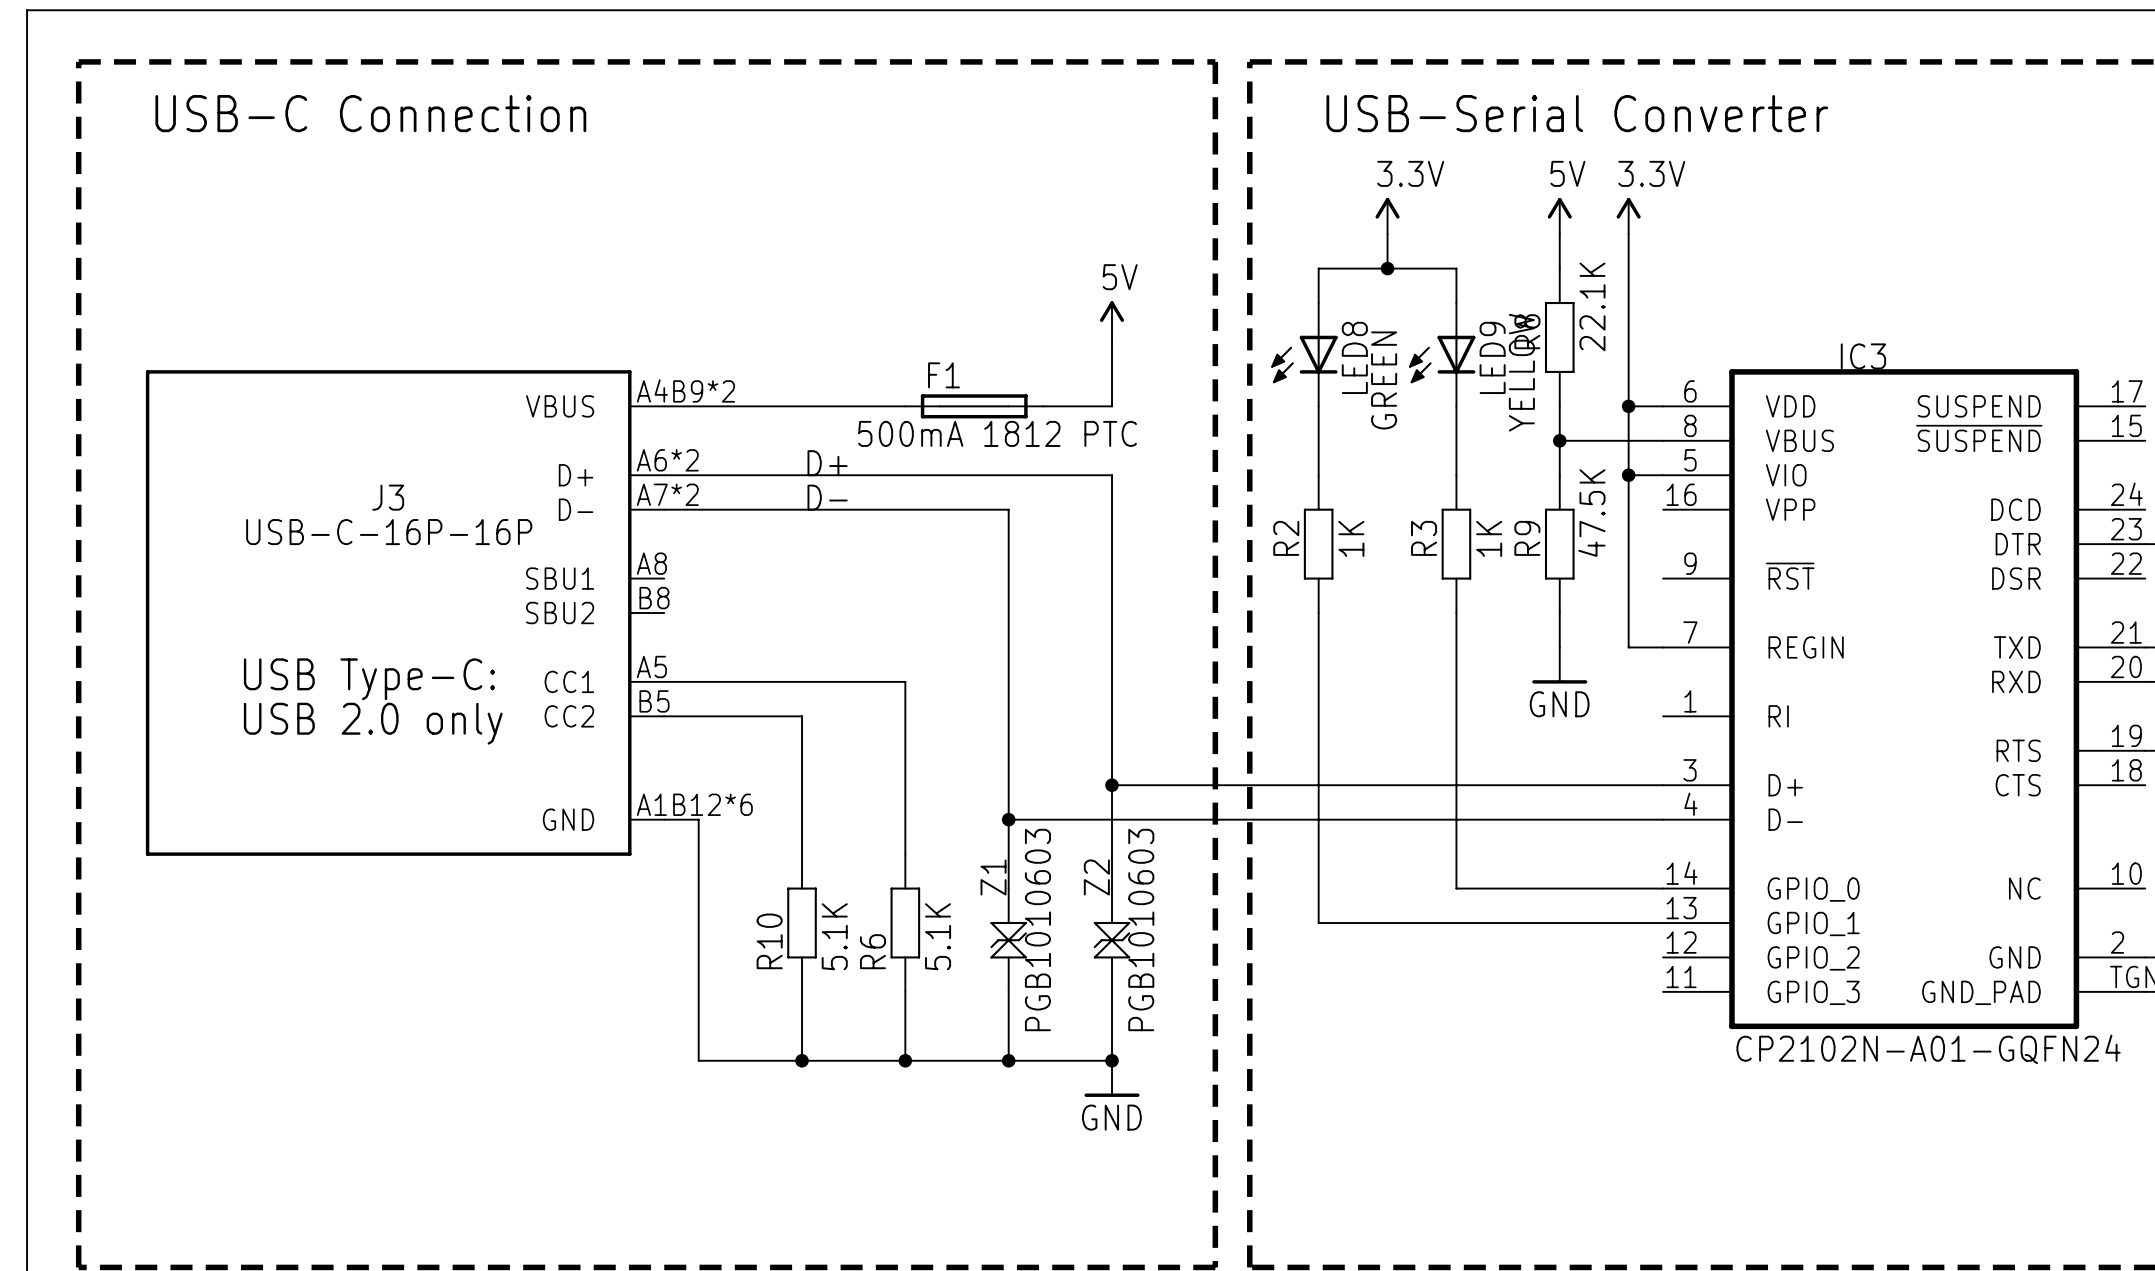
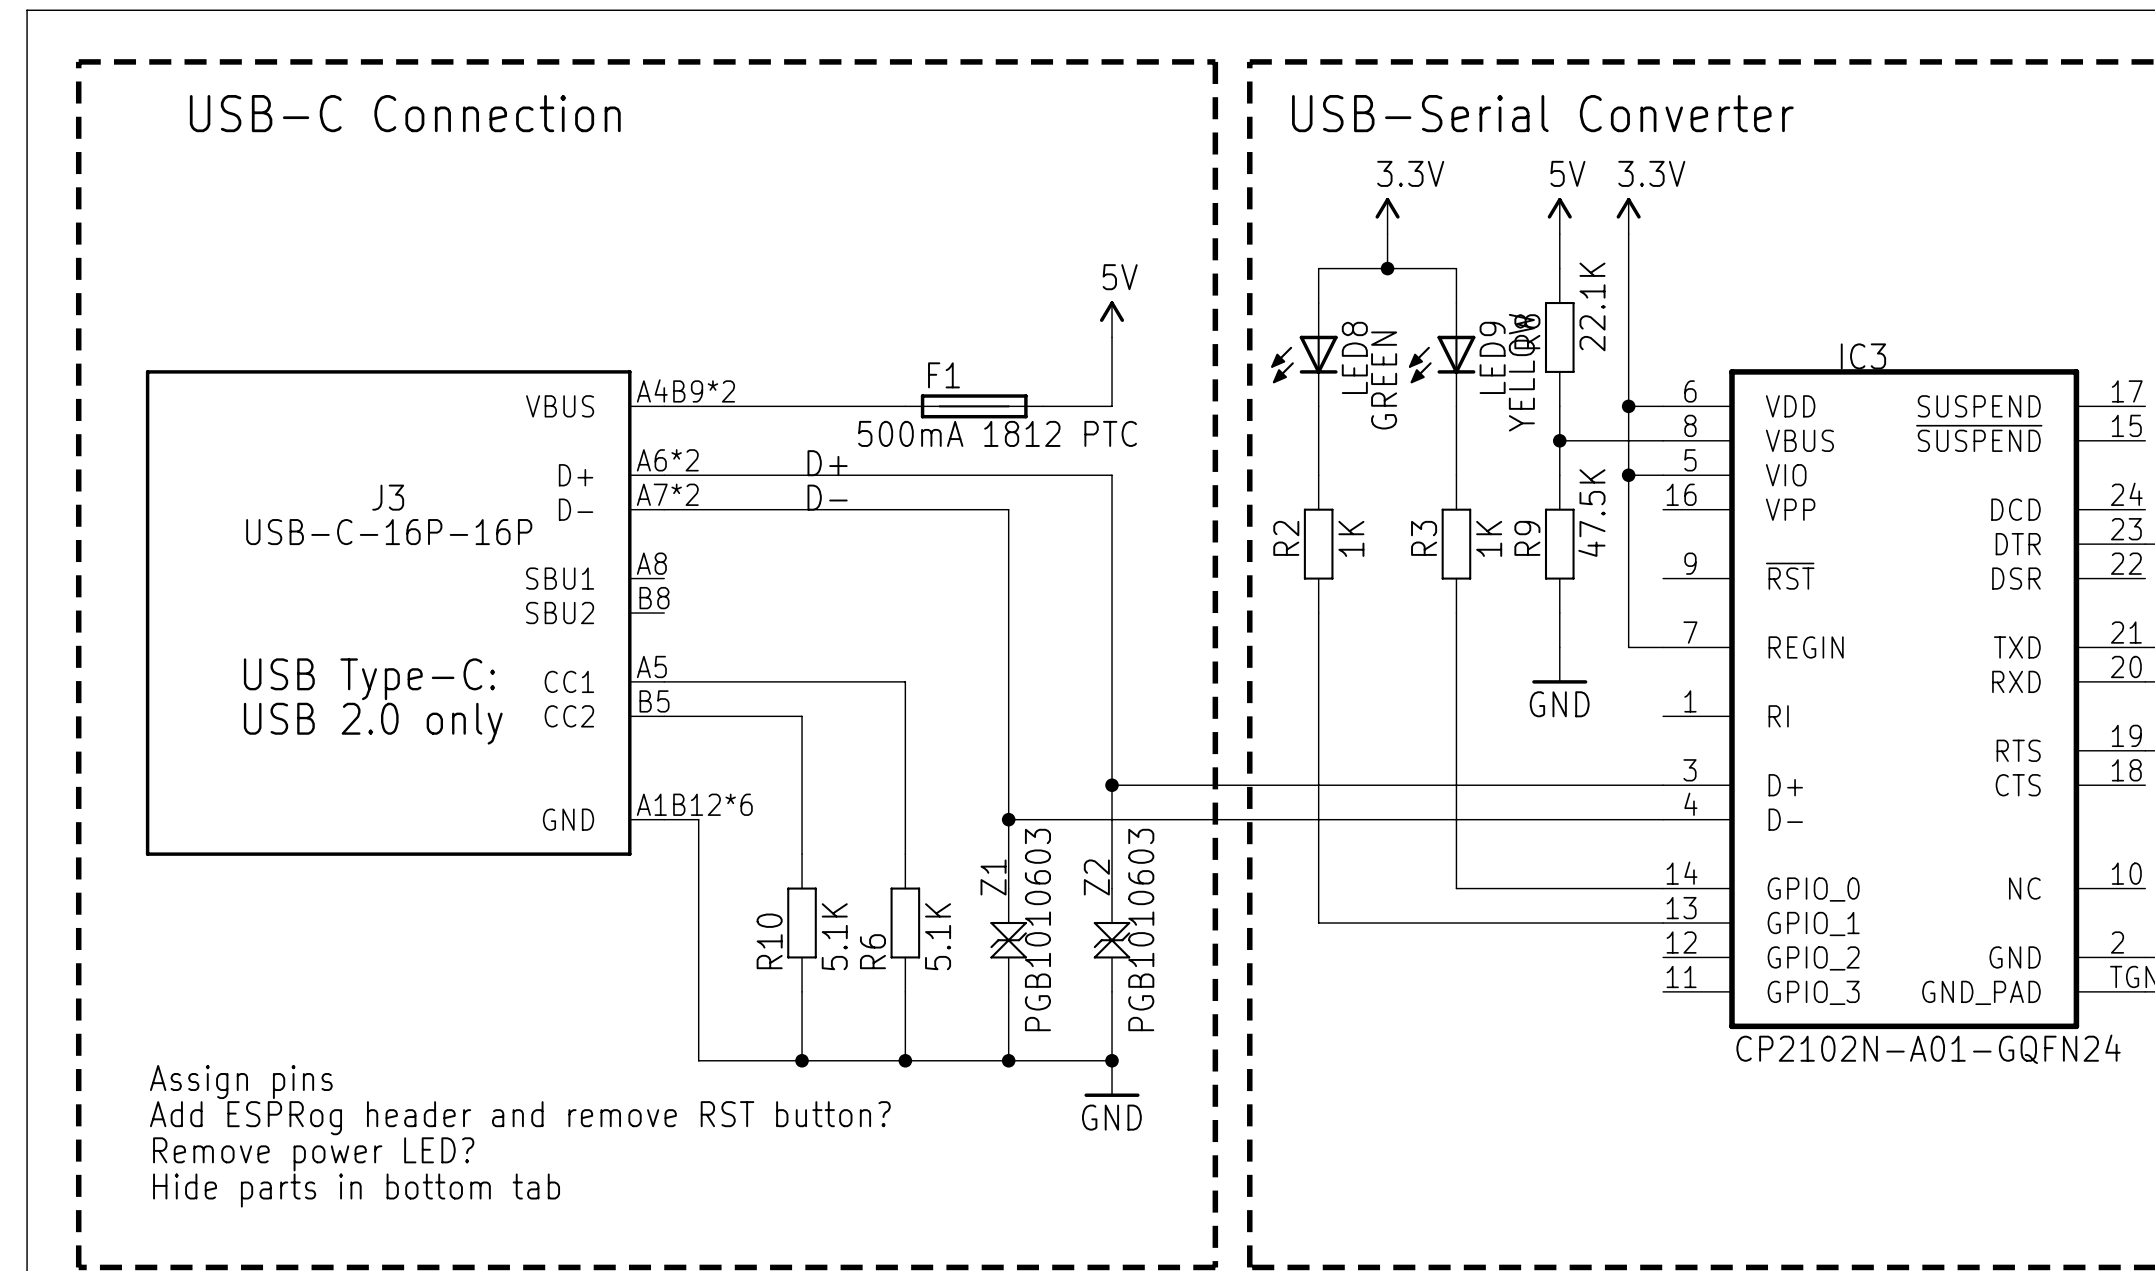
text position: USB-C Connection (370, 113) -> USB-C Connection (405, 113)
text position: USB-Serial Converter (1577, 113) -> USB-Serial Converter (1542, 113)
text: none -> Assign pins (241, 1082)
text: none -> Add ESPRog header and remove RST button? (520, 1118)
text: none -> Remove power LED? (313, 1154)
text: none -> Hide parts in bottom tab (356, 1190)

